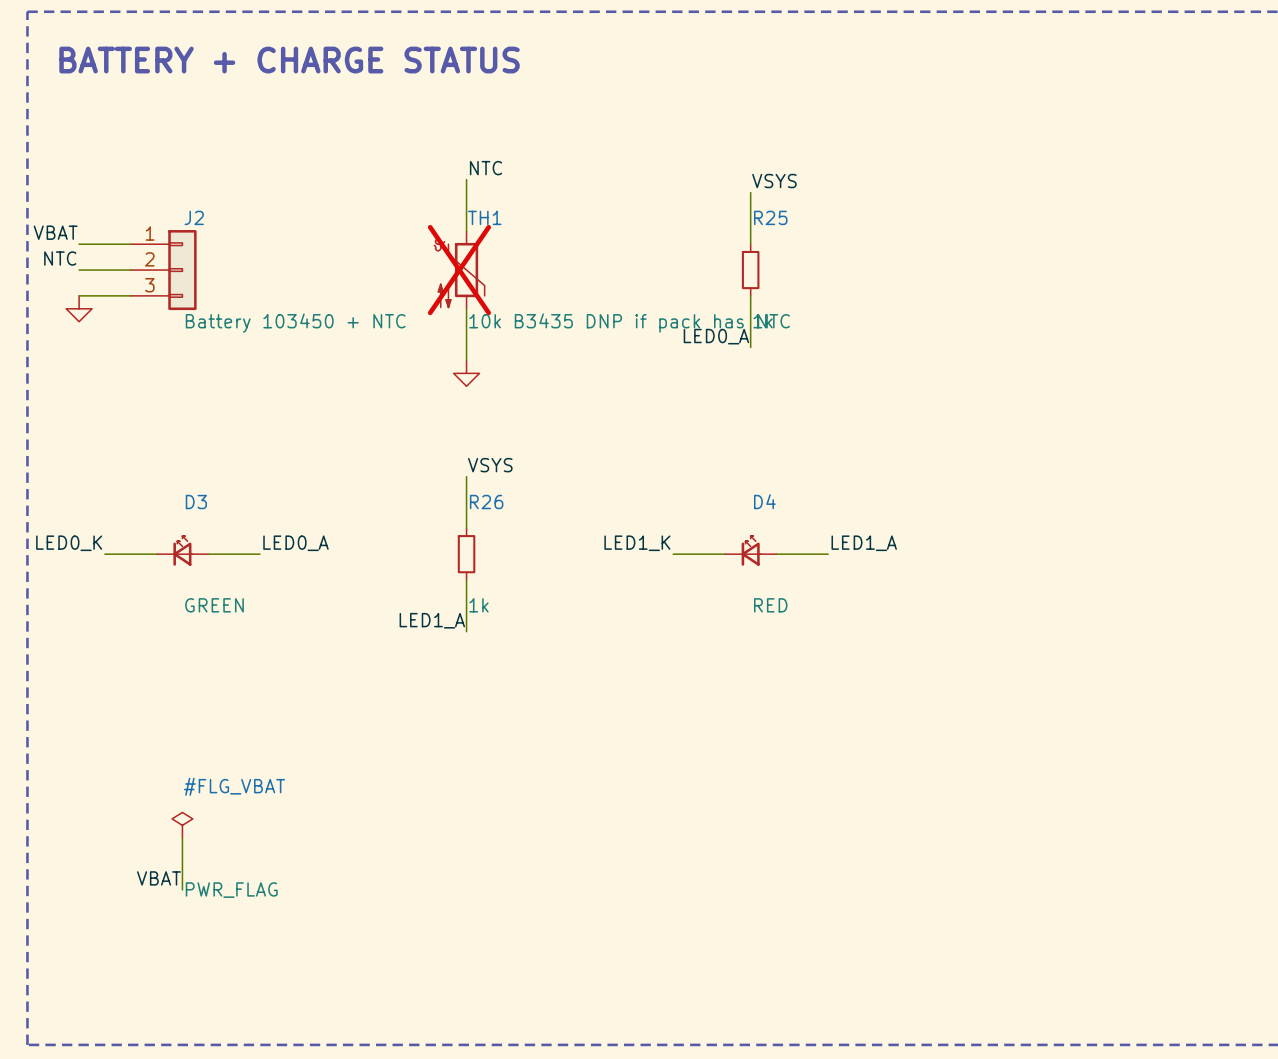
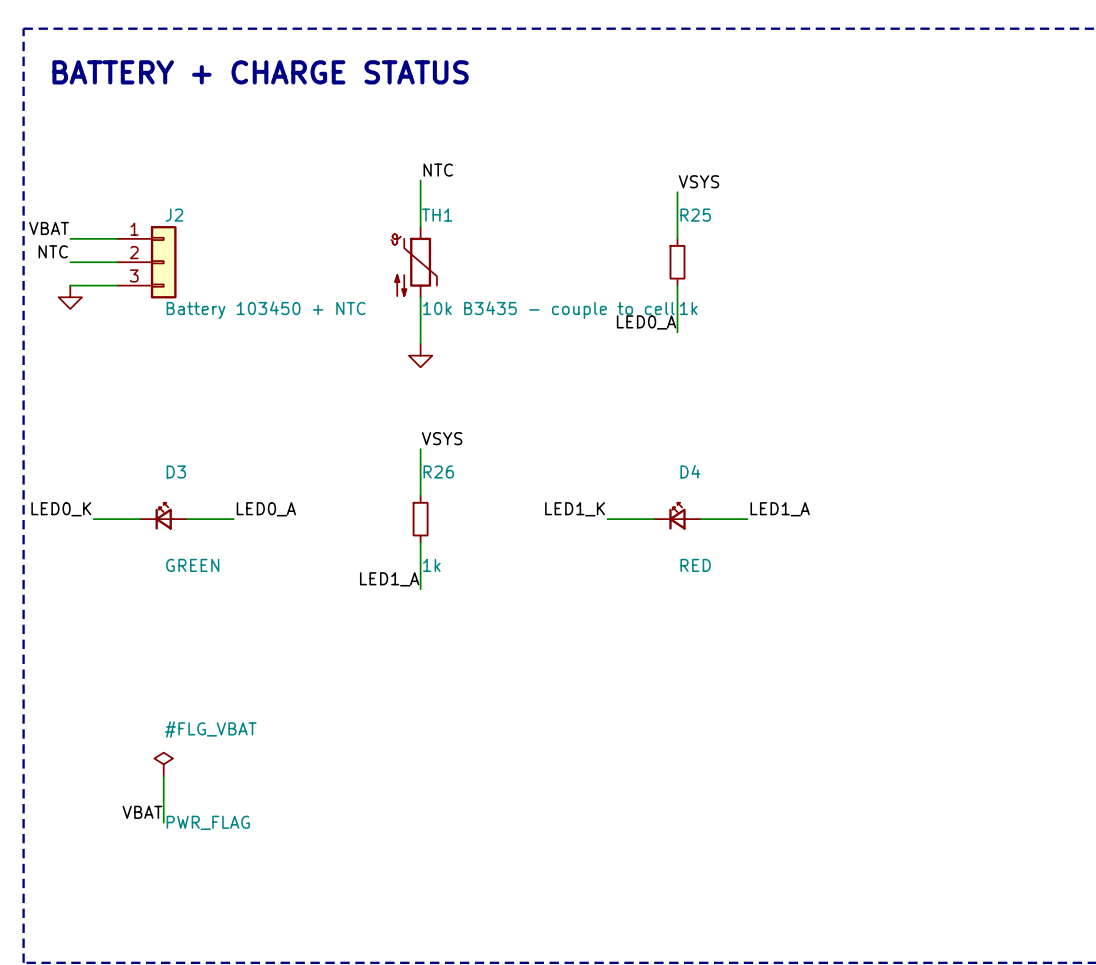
TH1 do-not-place cross: (459, 270) -> none
TH1 value: 10k B3435 DNP if pack has NTC (629, 323) -> 10k B3435 - couple to cell (548, 310)

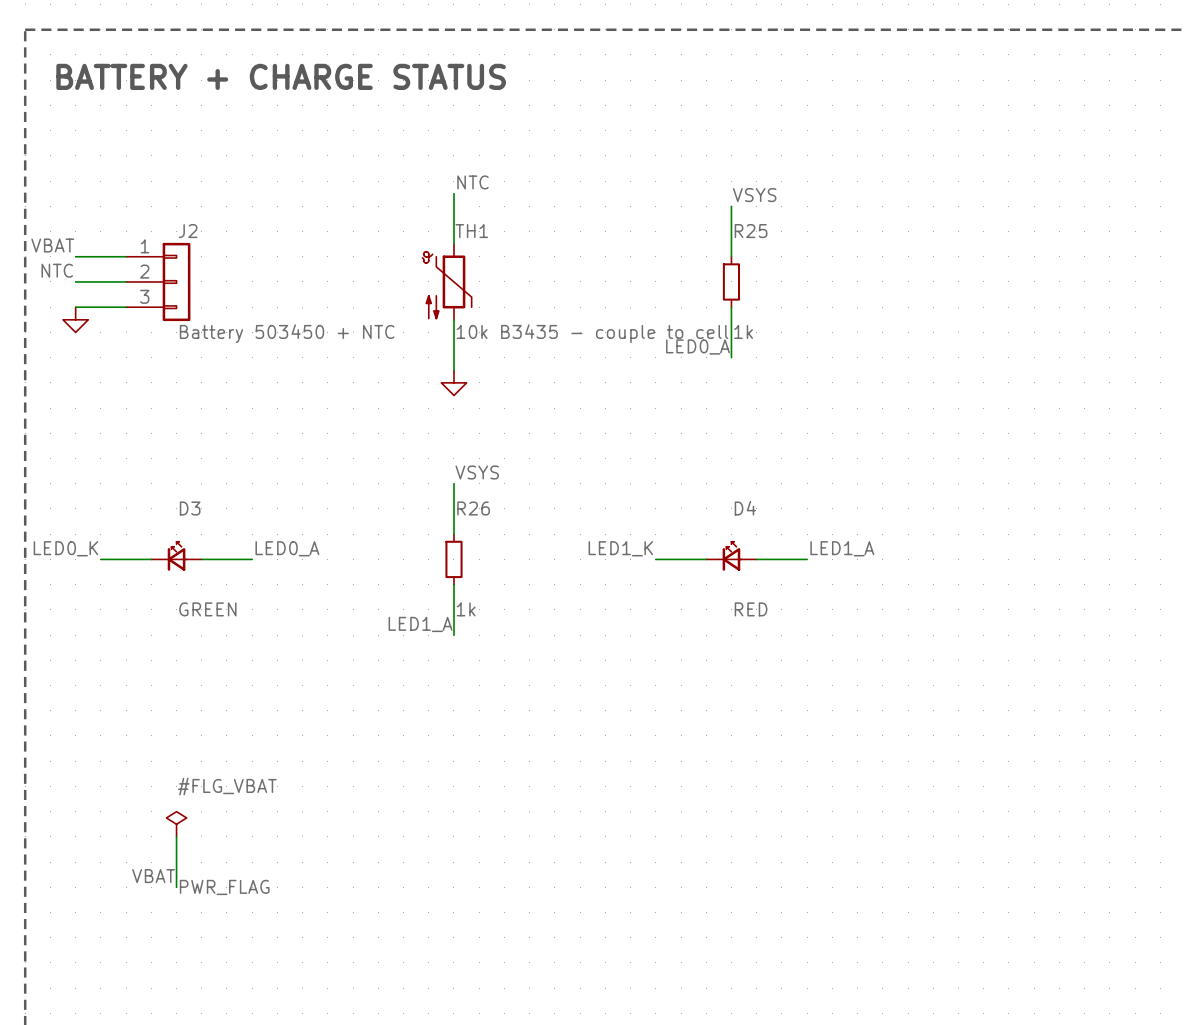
J2 value: Battery 103450 + NTC (266, 310) -> Battery 503450 + NTC (287, 333)

